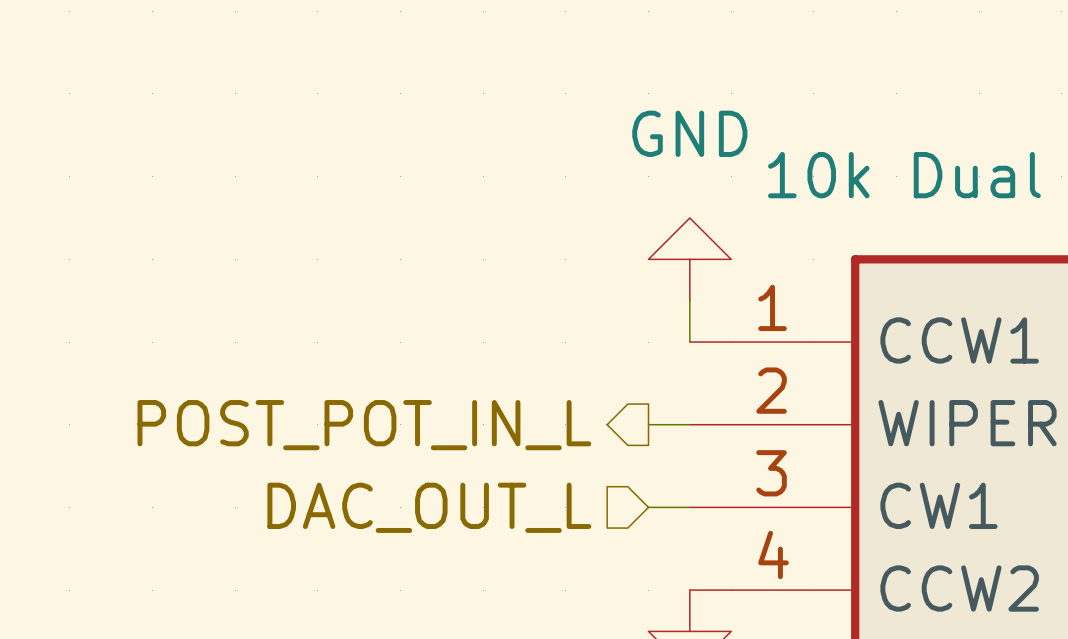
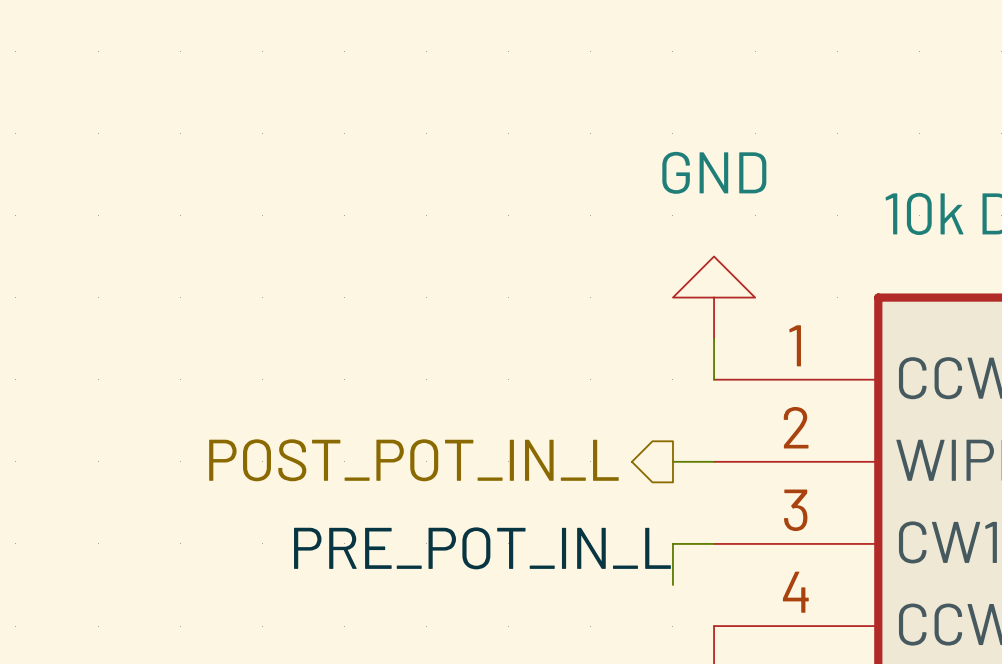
hierarchical label: DAC_OUT_L (429, 507) -> none
wire: none -> (672, 543) (672, 585)
label: none -> PRE_POT_IN_L (482, 548)

